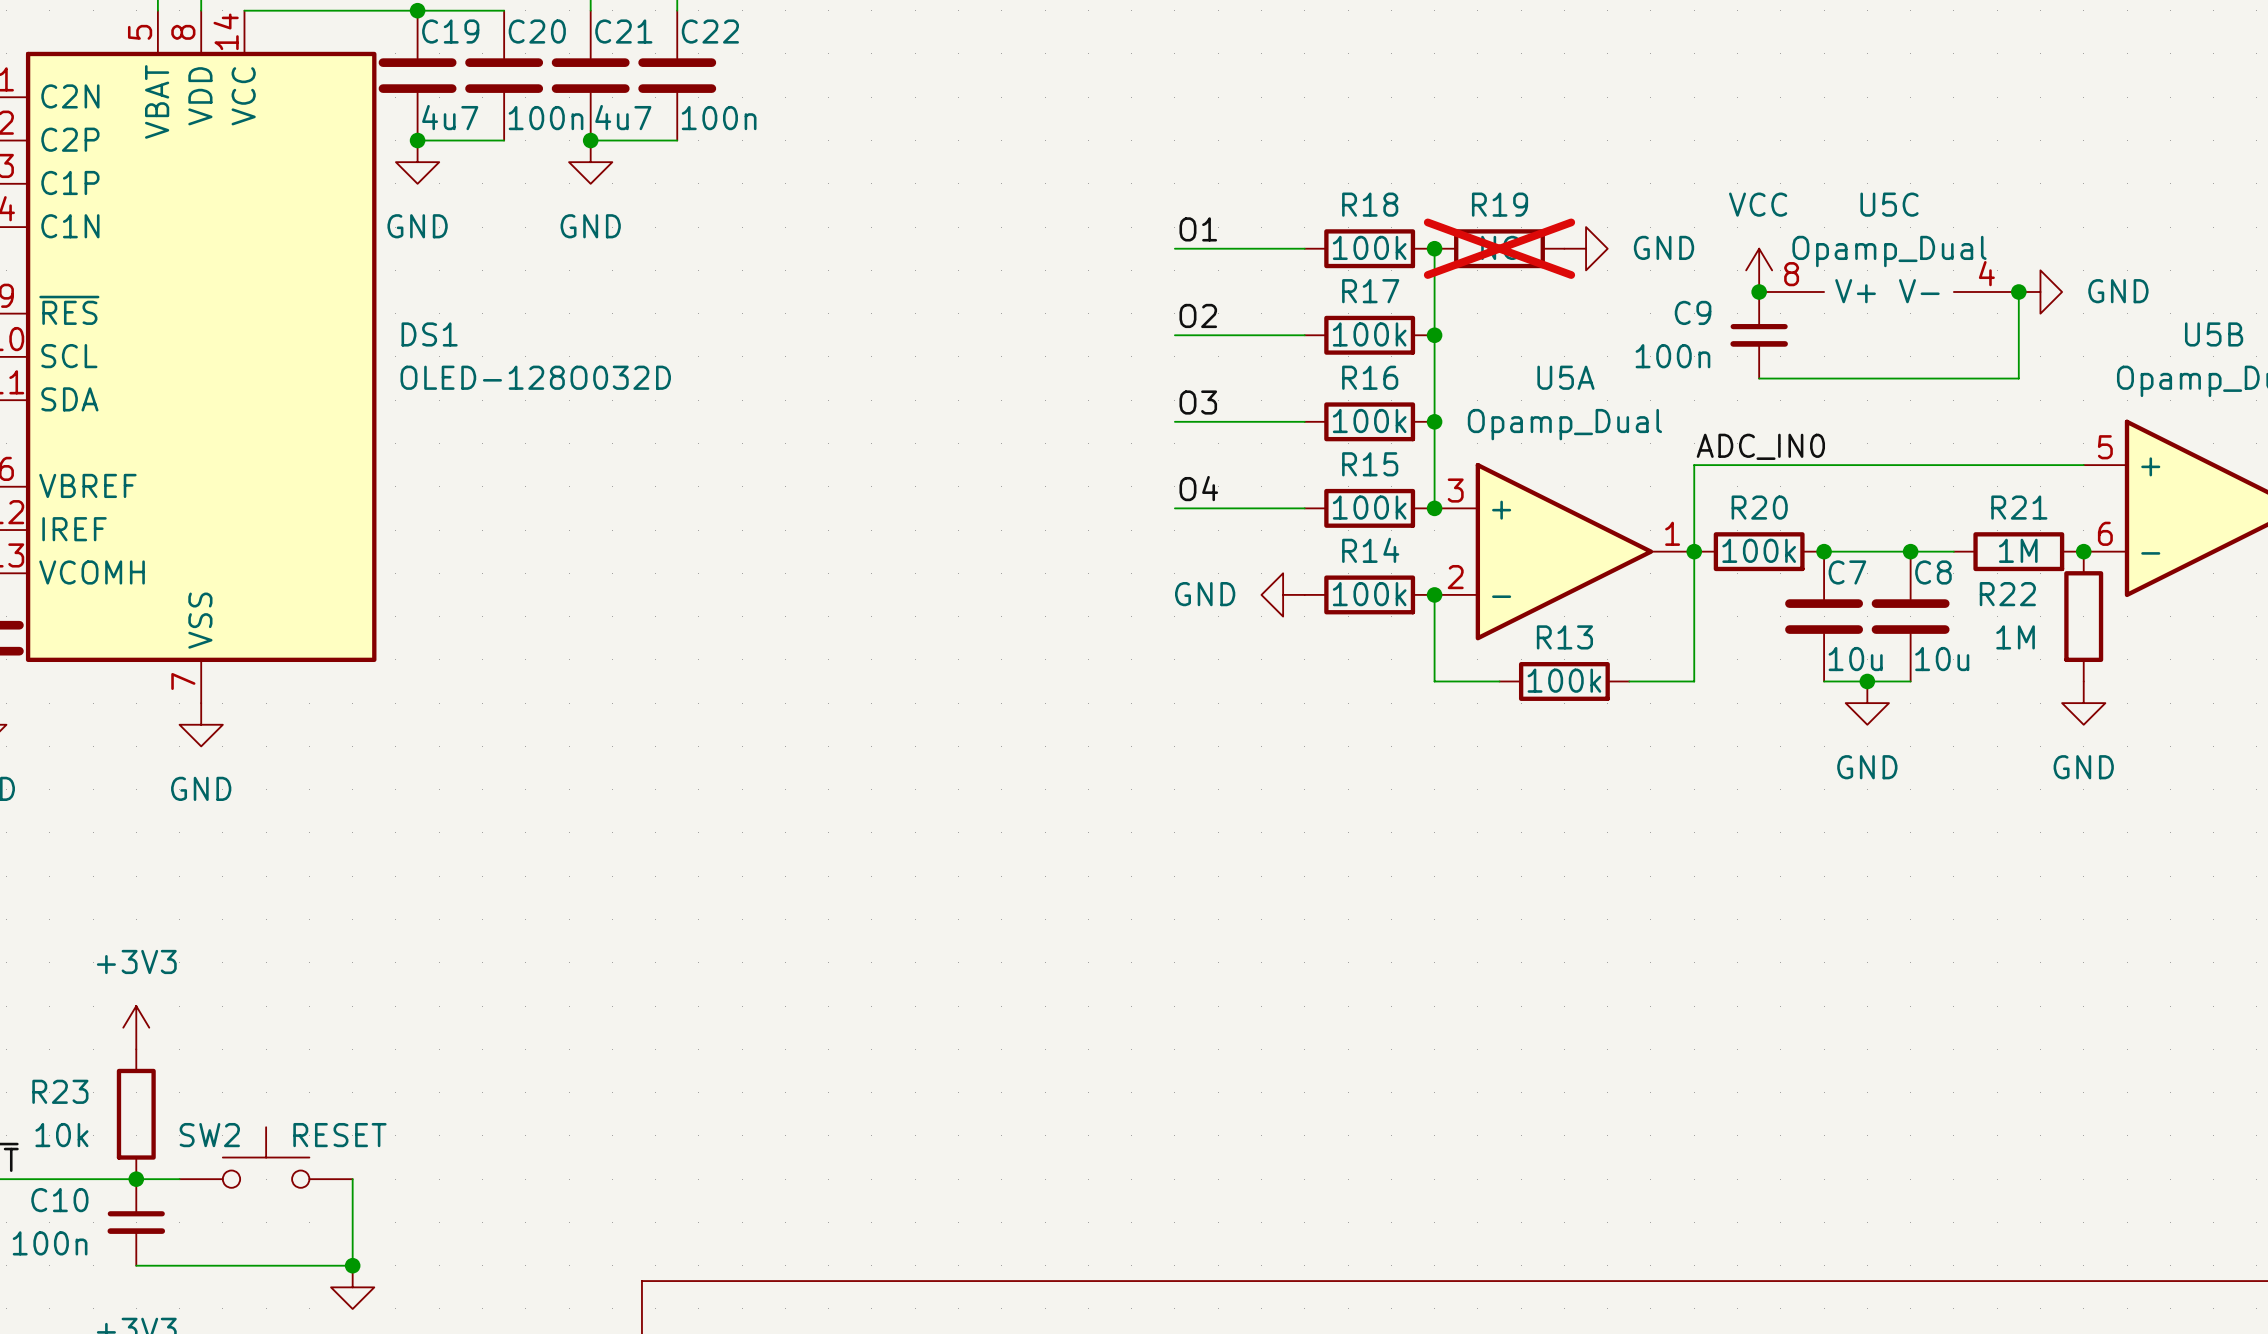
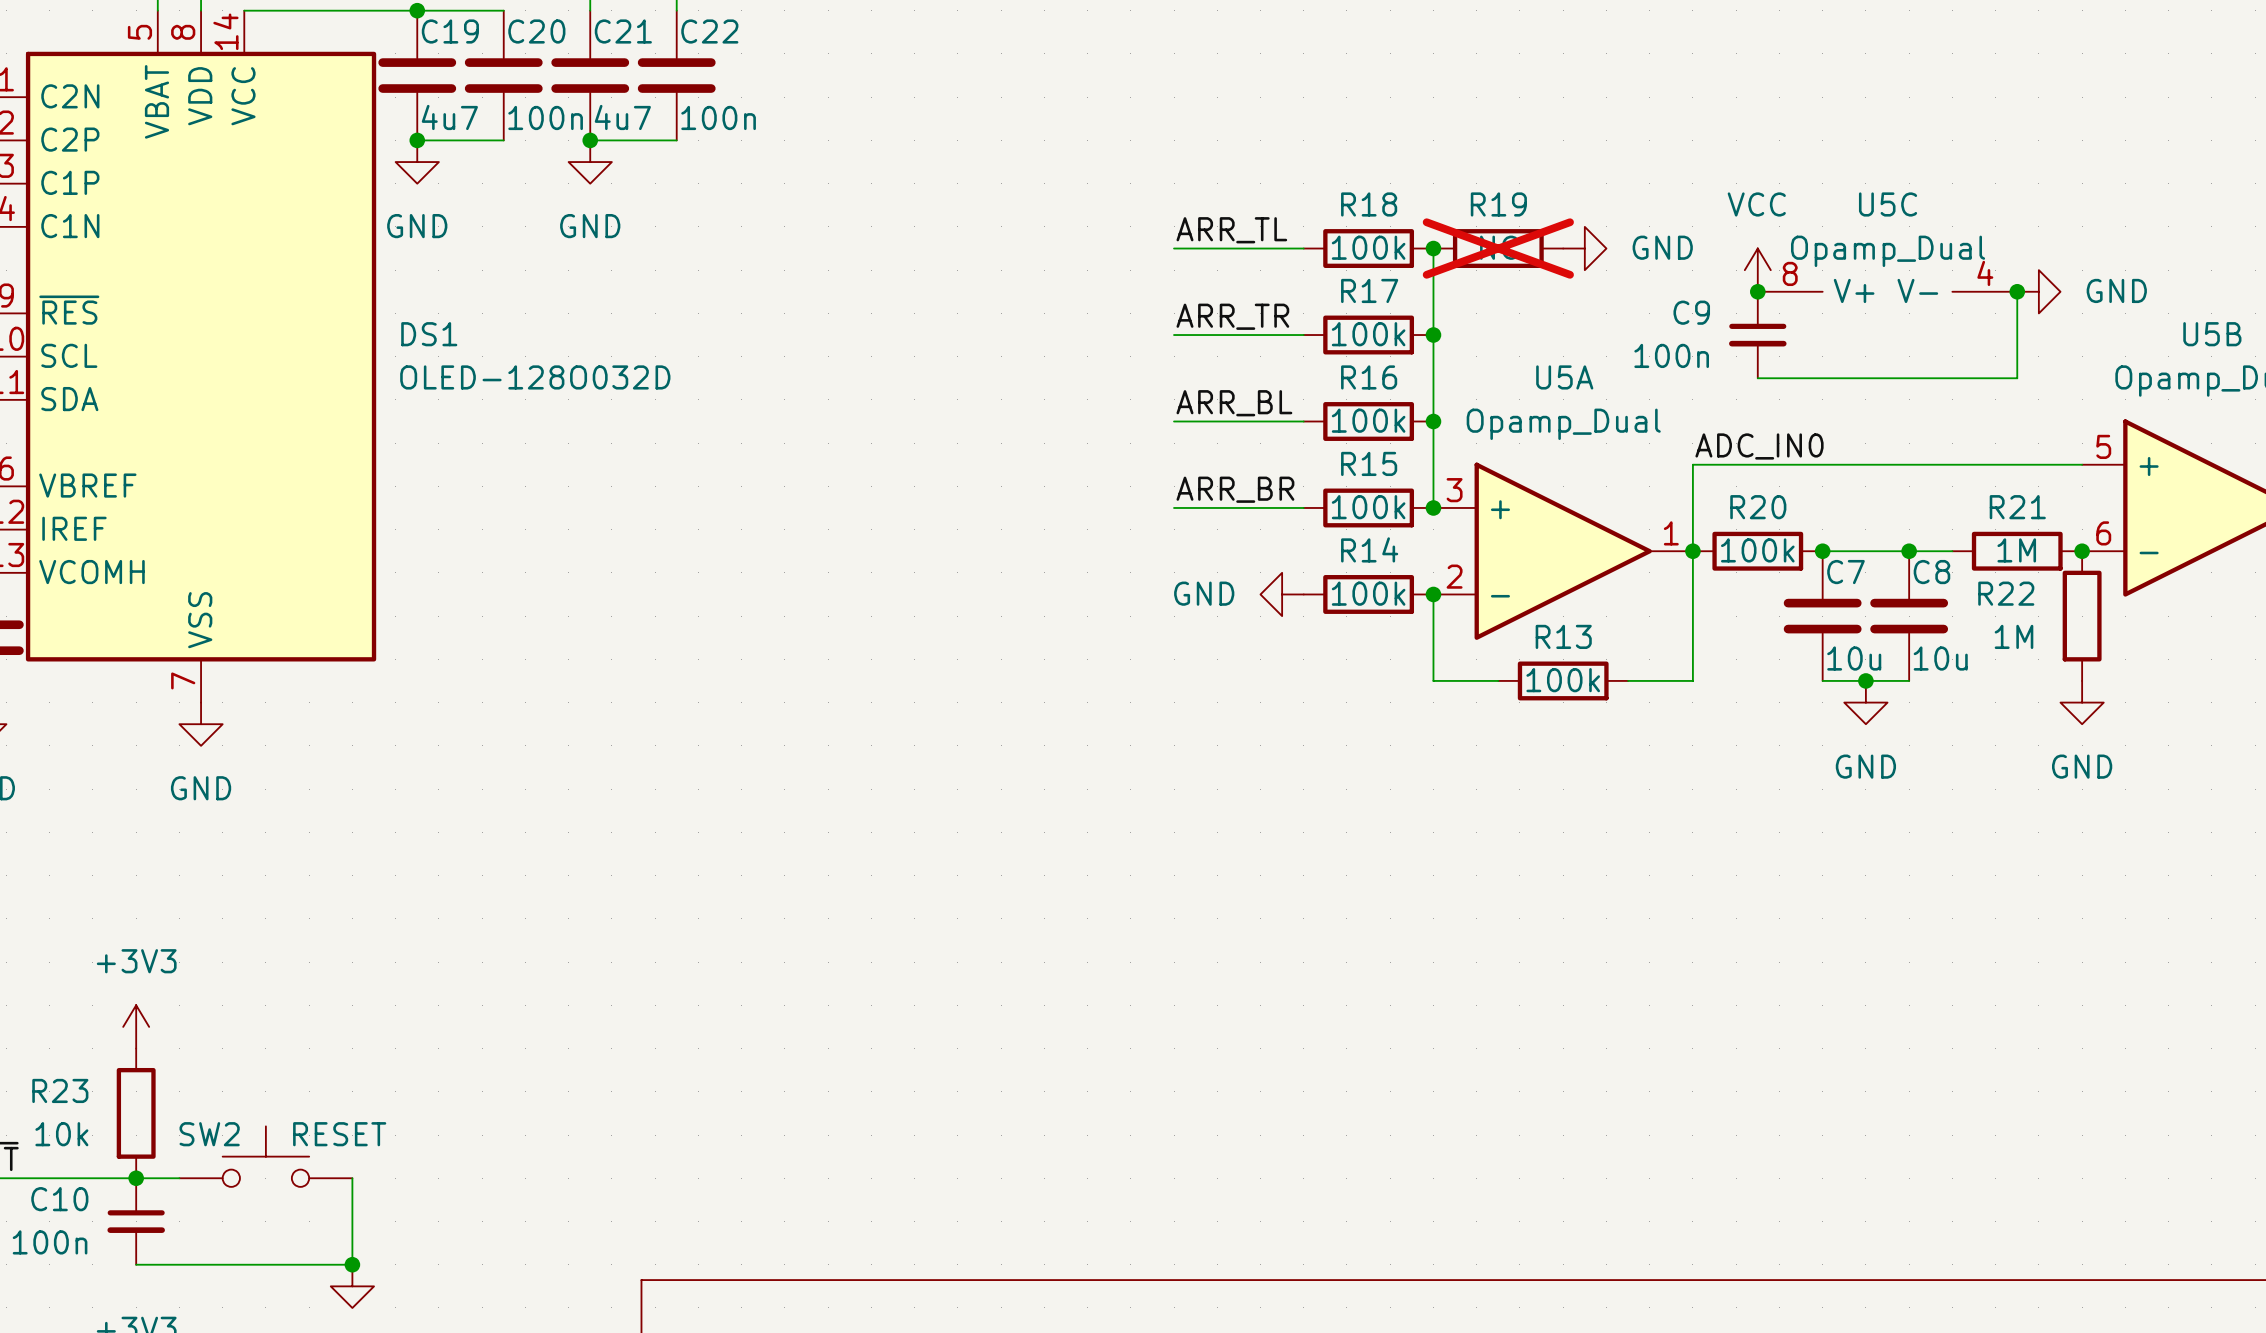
label: O1 (1198, 229) -> ARR_TL (1231, 230)
label: O2 (1198, 315) -> ARR_TR (1232, 316)
label: O3 (1198, 402) -> ARR_BL (1234, 403)
label: O4 (1198, 488) -> ARR_BR (1235, 489)

